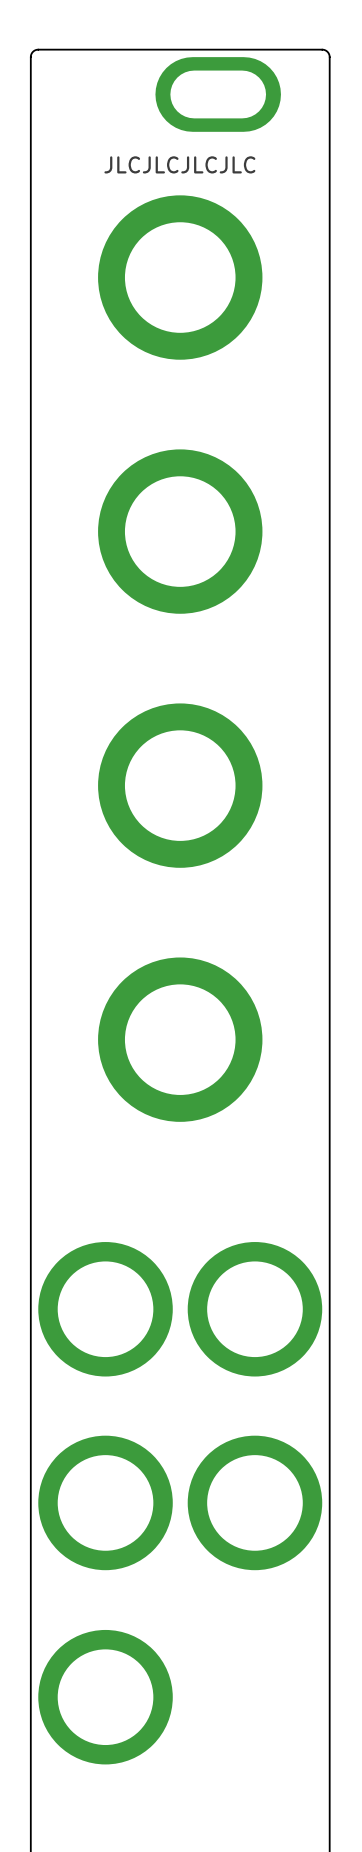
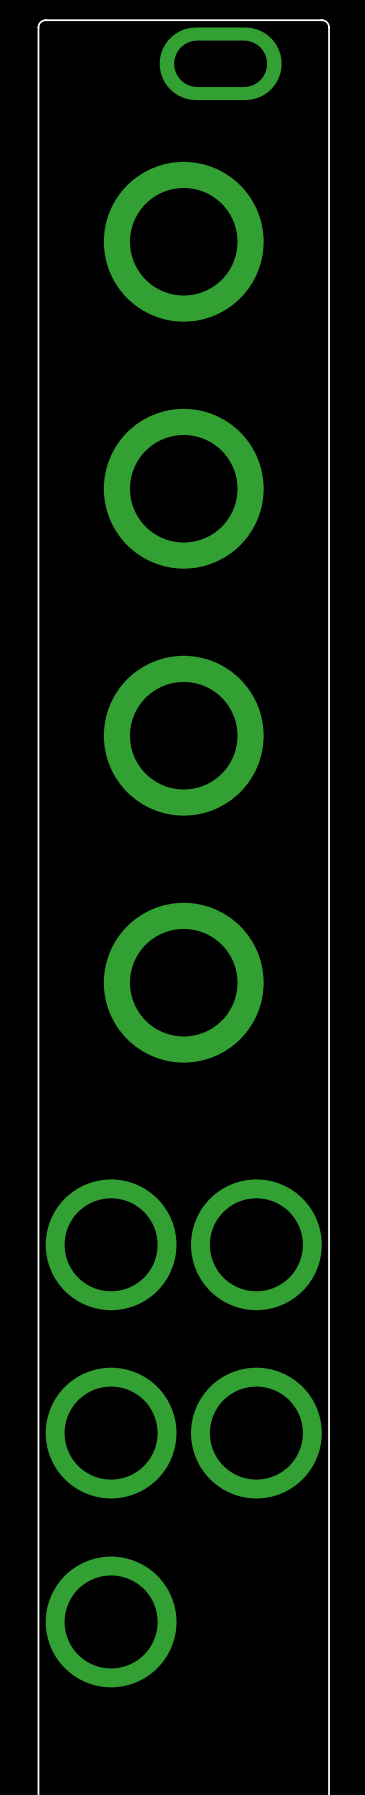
text: JLCJLCJLCJLC (179, 164) -> none

